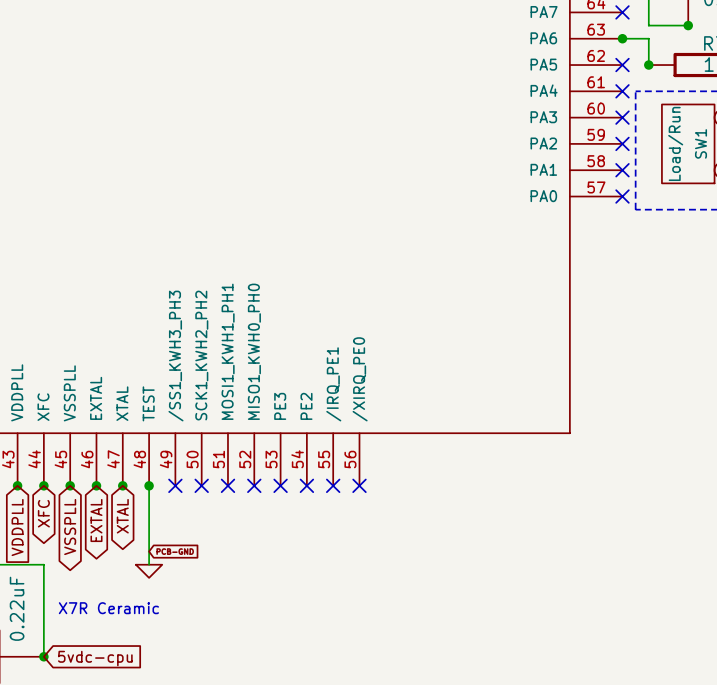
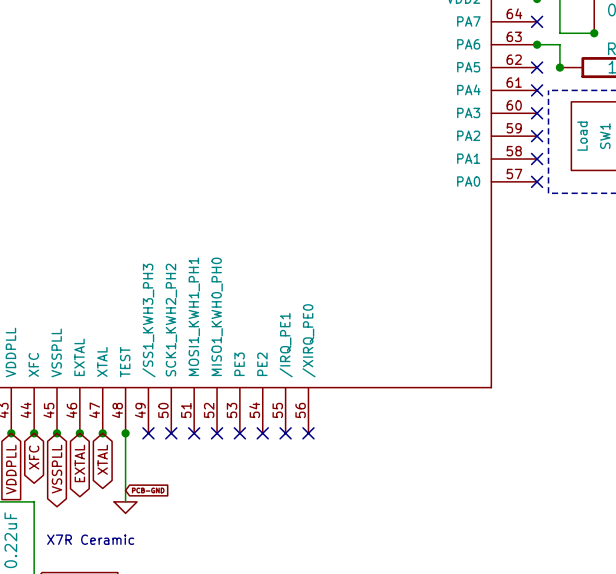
SW1 value: Load/Run (675, 143) -> Load (582, 136)

